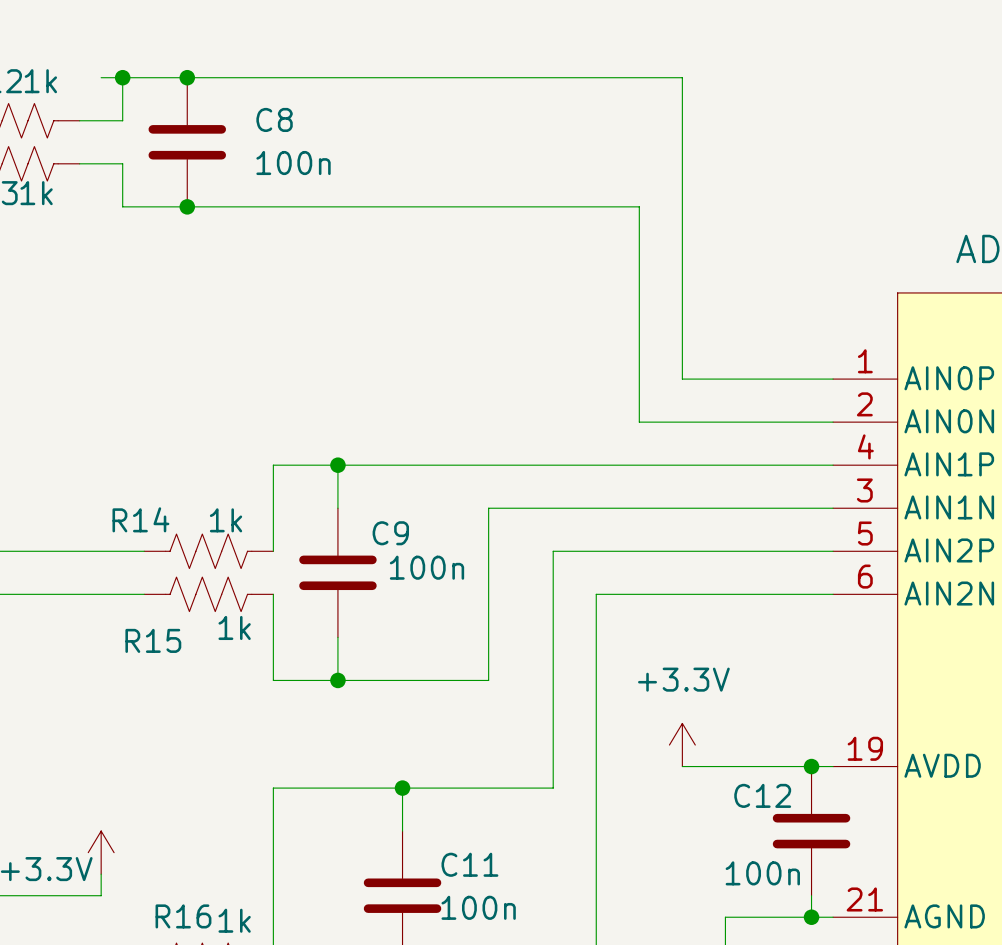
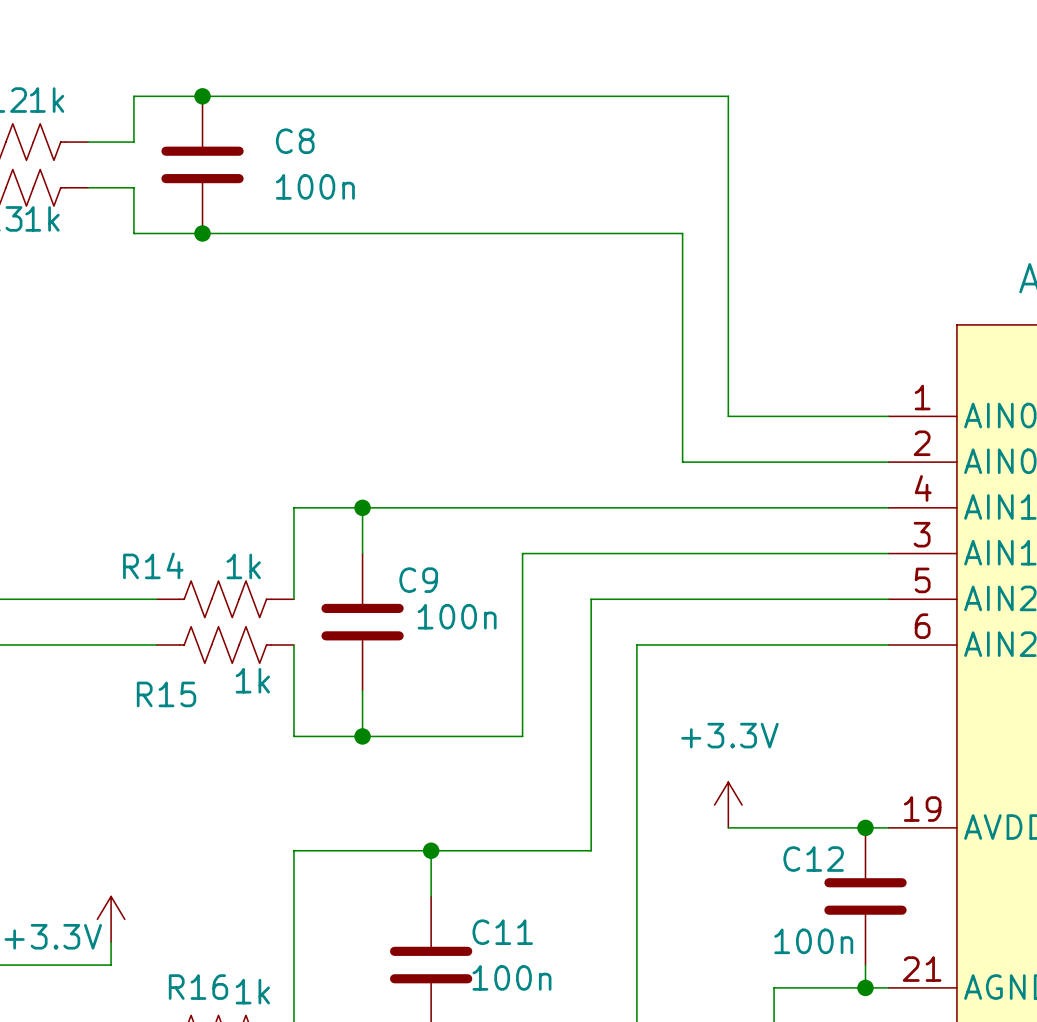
wire: (101, 77) (122, 77) -> none
junction: (122, 77) -> none

